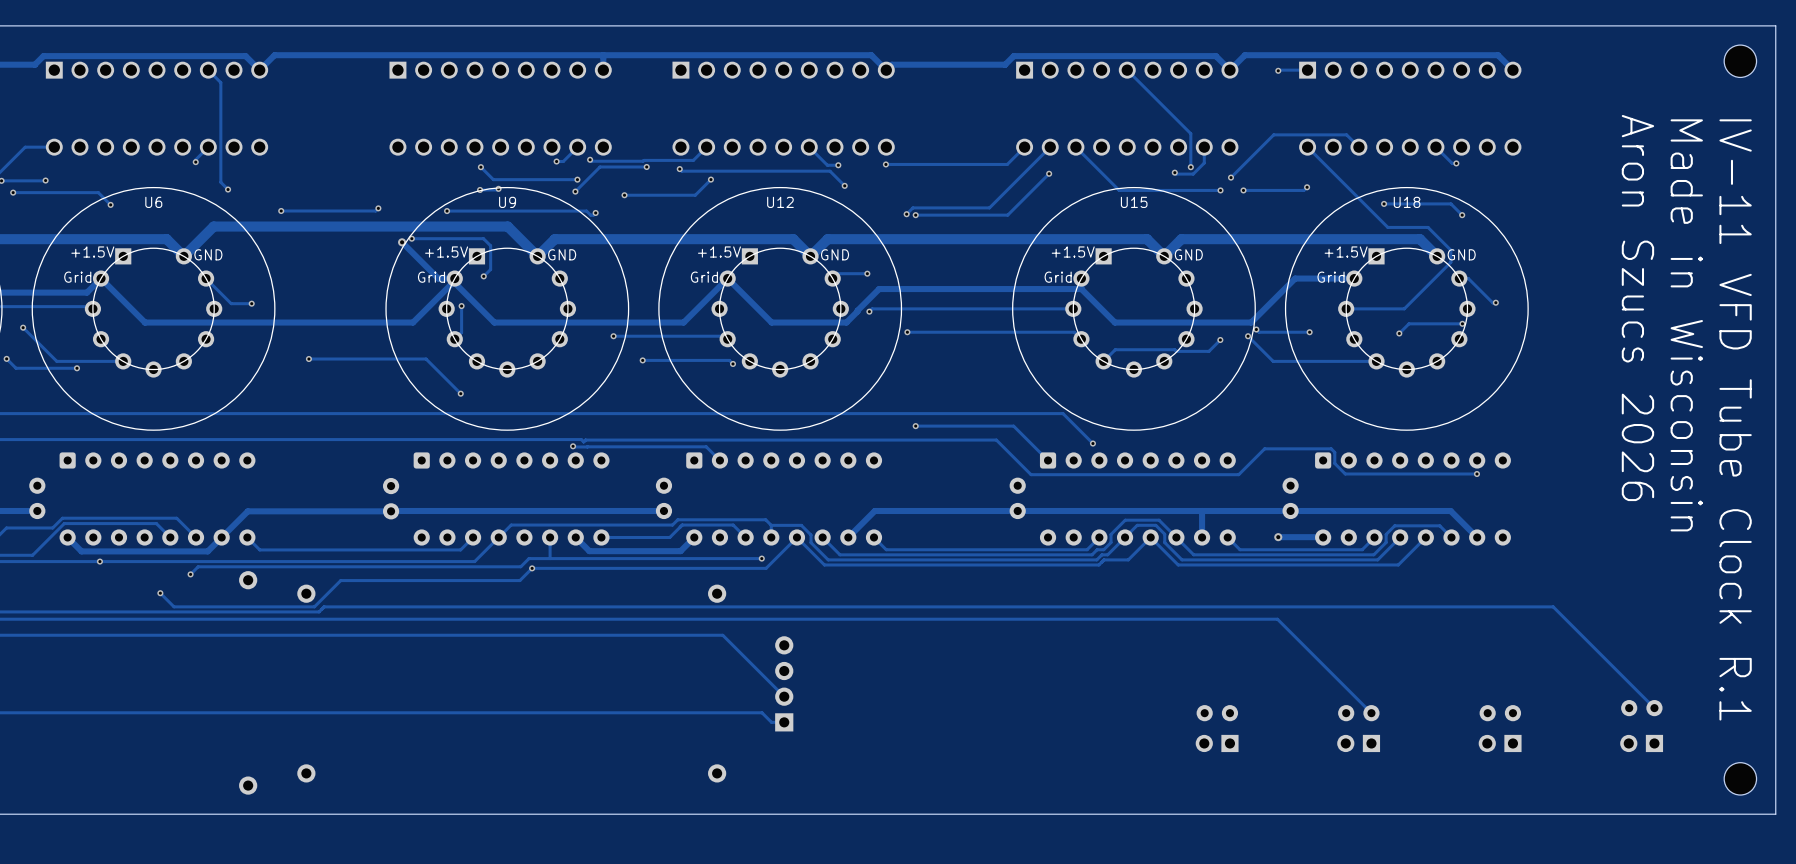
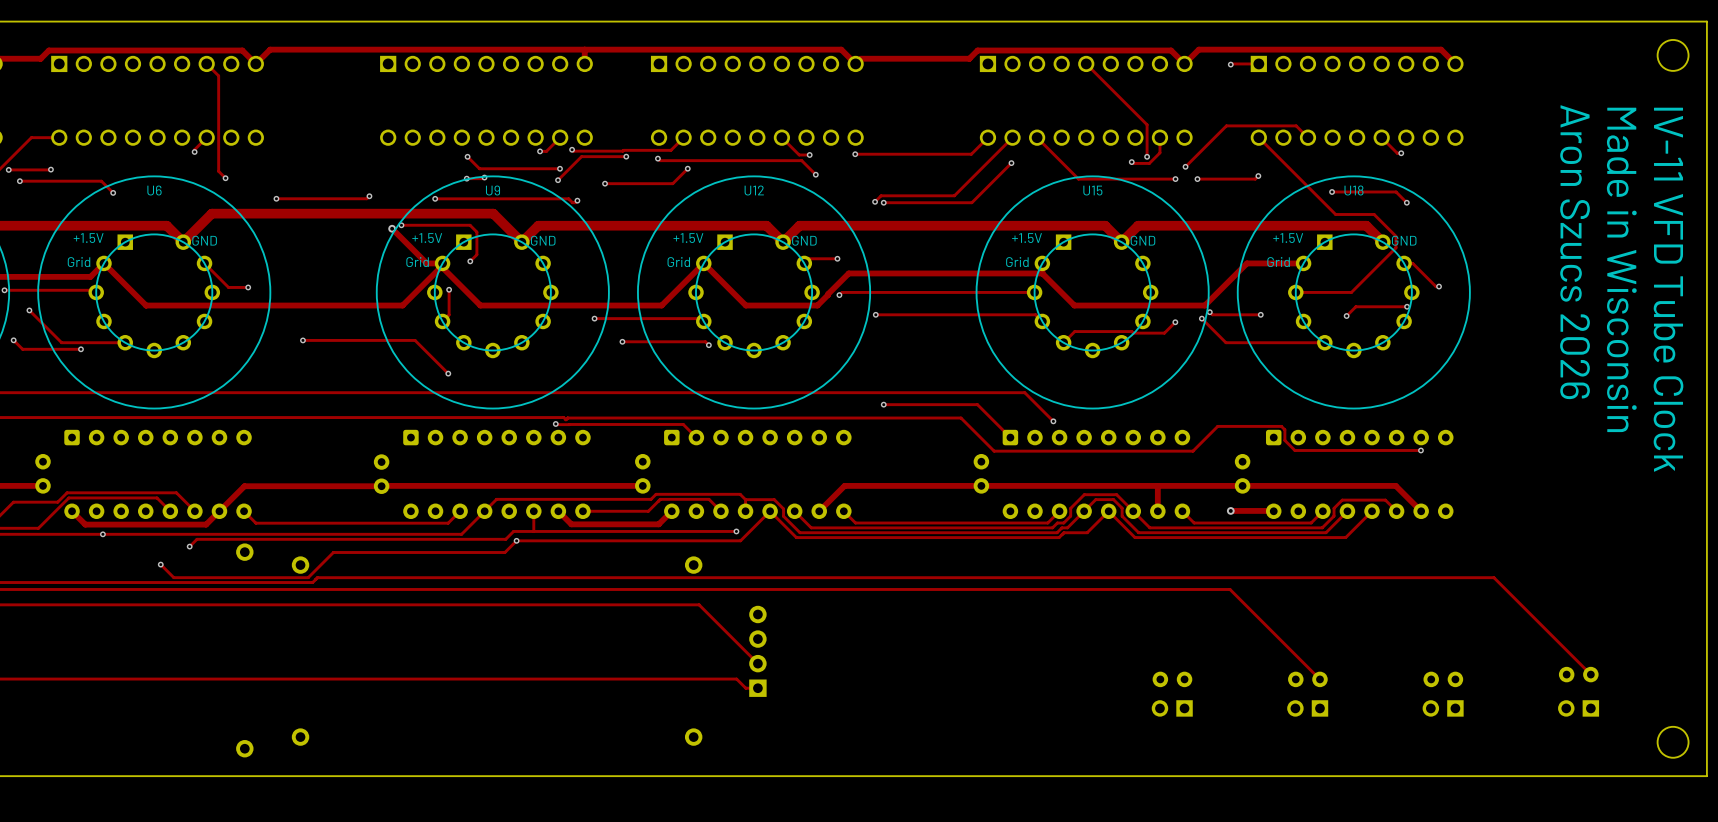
text: IV-11 VFD Tube Clock R.1 (1735, 419) -> IV-11 VFD Tube Clock (1668, 289)

